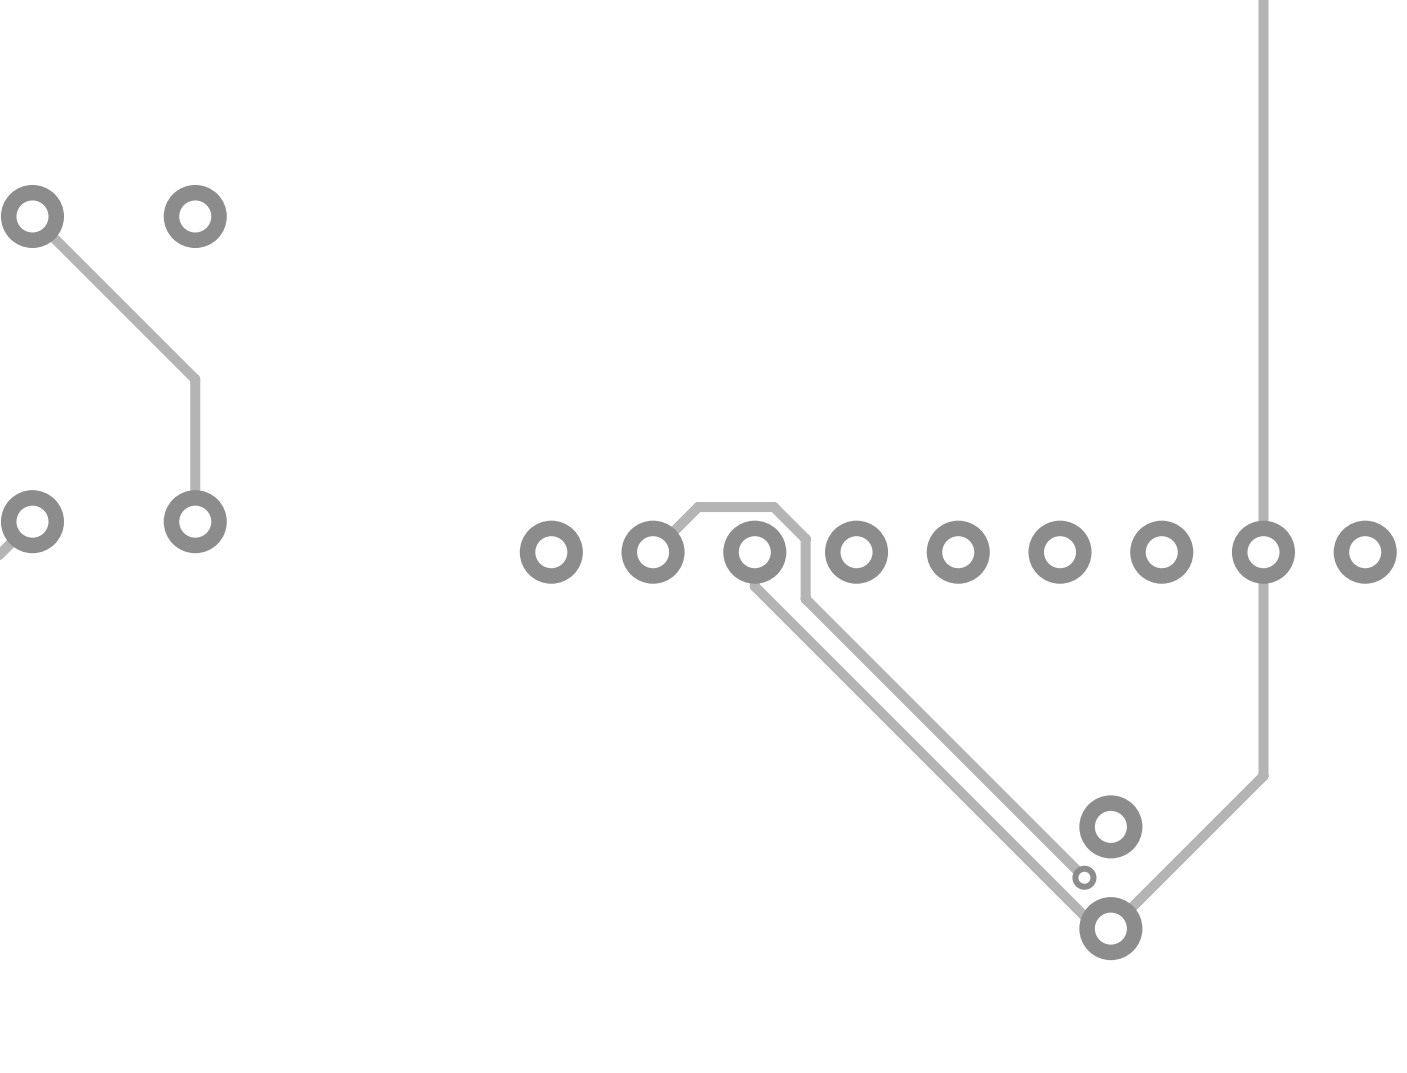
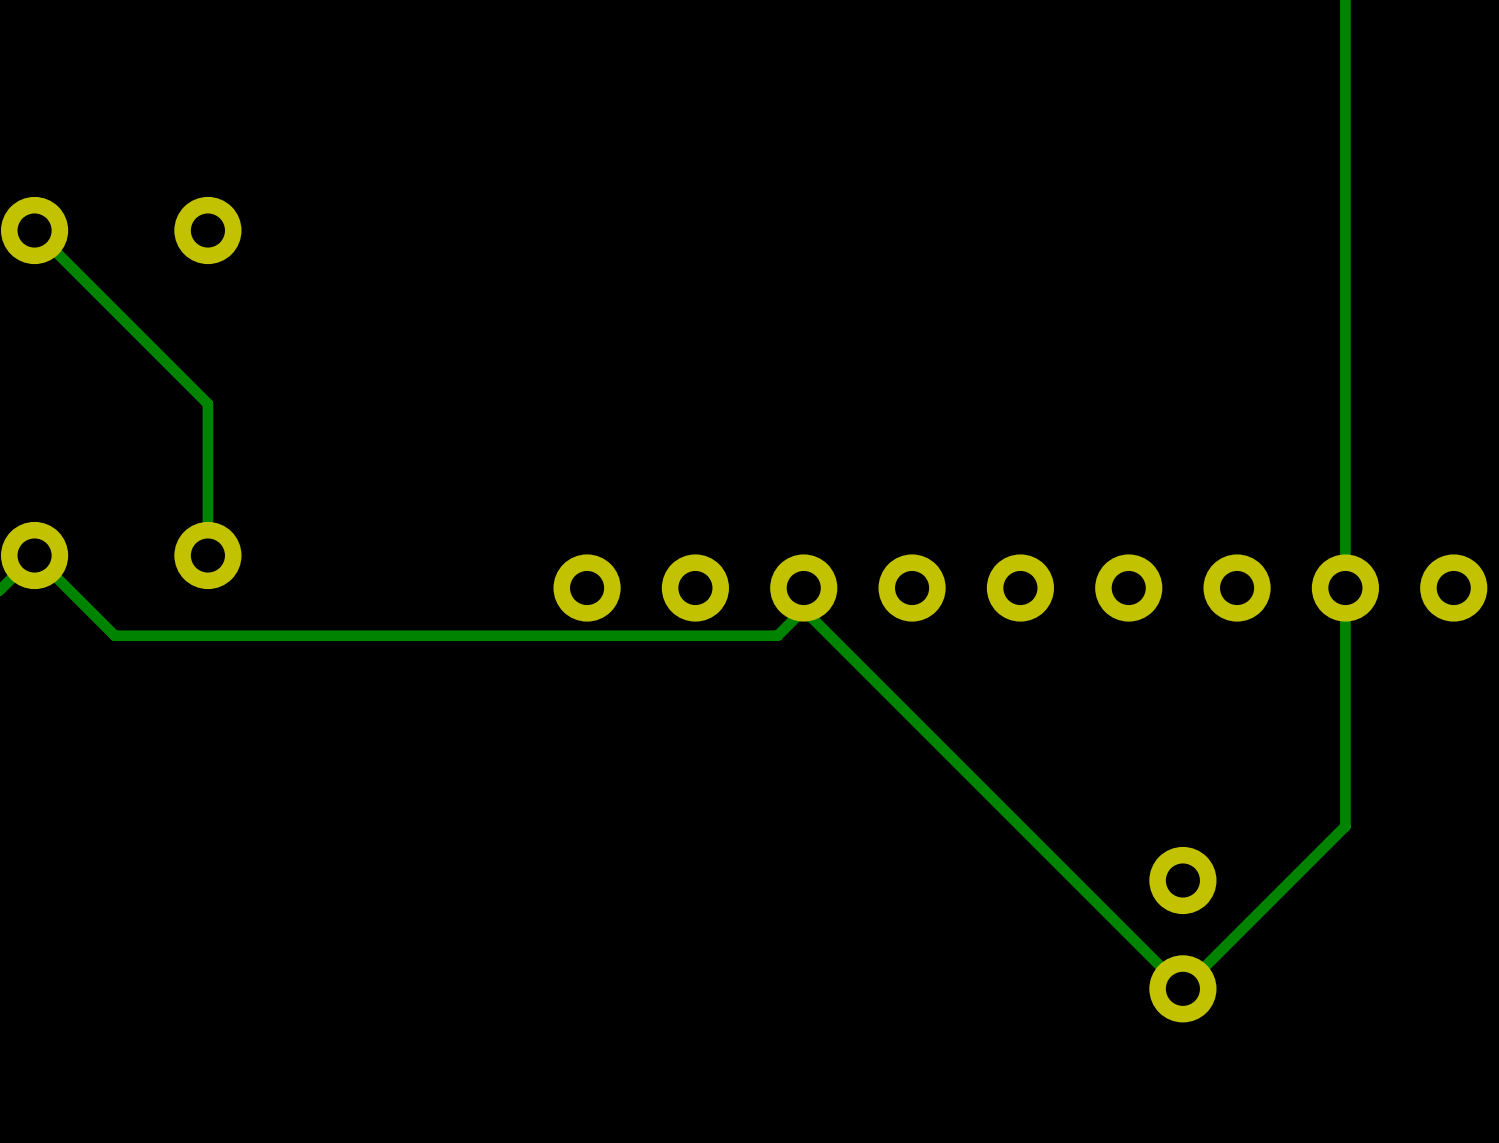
track: (653, 552) (698, 507) (773, 507) (805, 538) (805, 598) (1084, 877) -> none
track: (754, 572) (754, 586) (1096, 928) (1110, 928) -> (34, 555) (114, 635) (777, 635) (803, 609) (1182, 988)
via: (1084, 877) -> none

